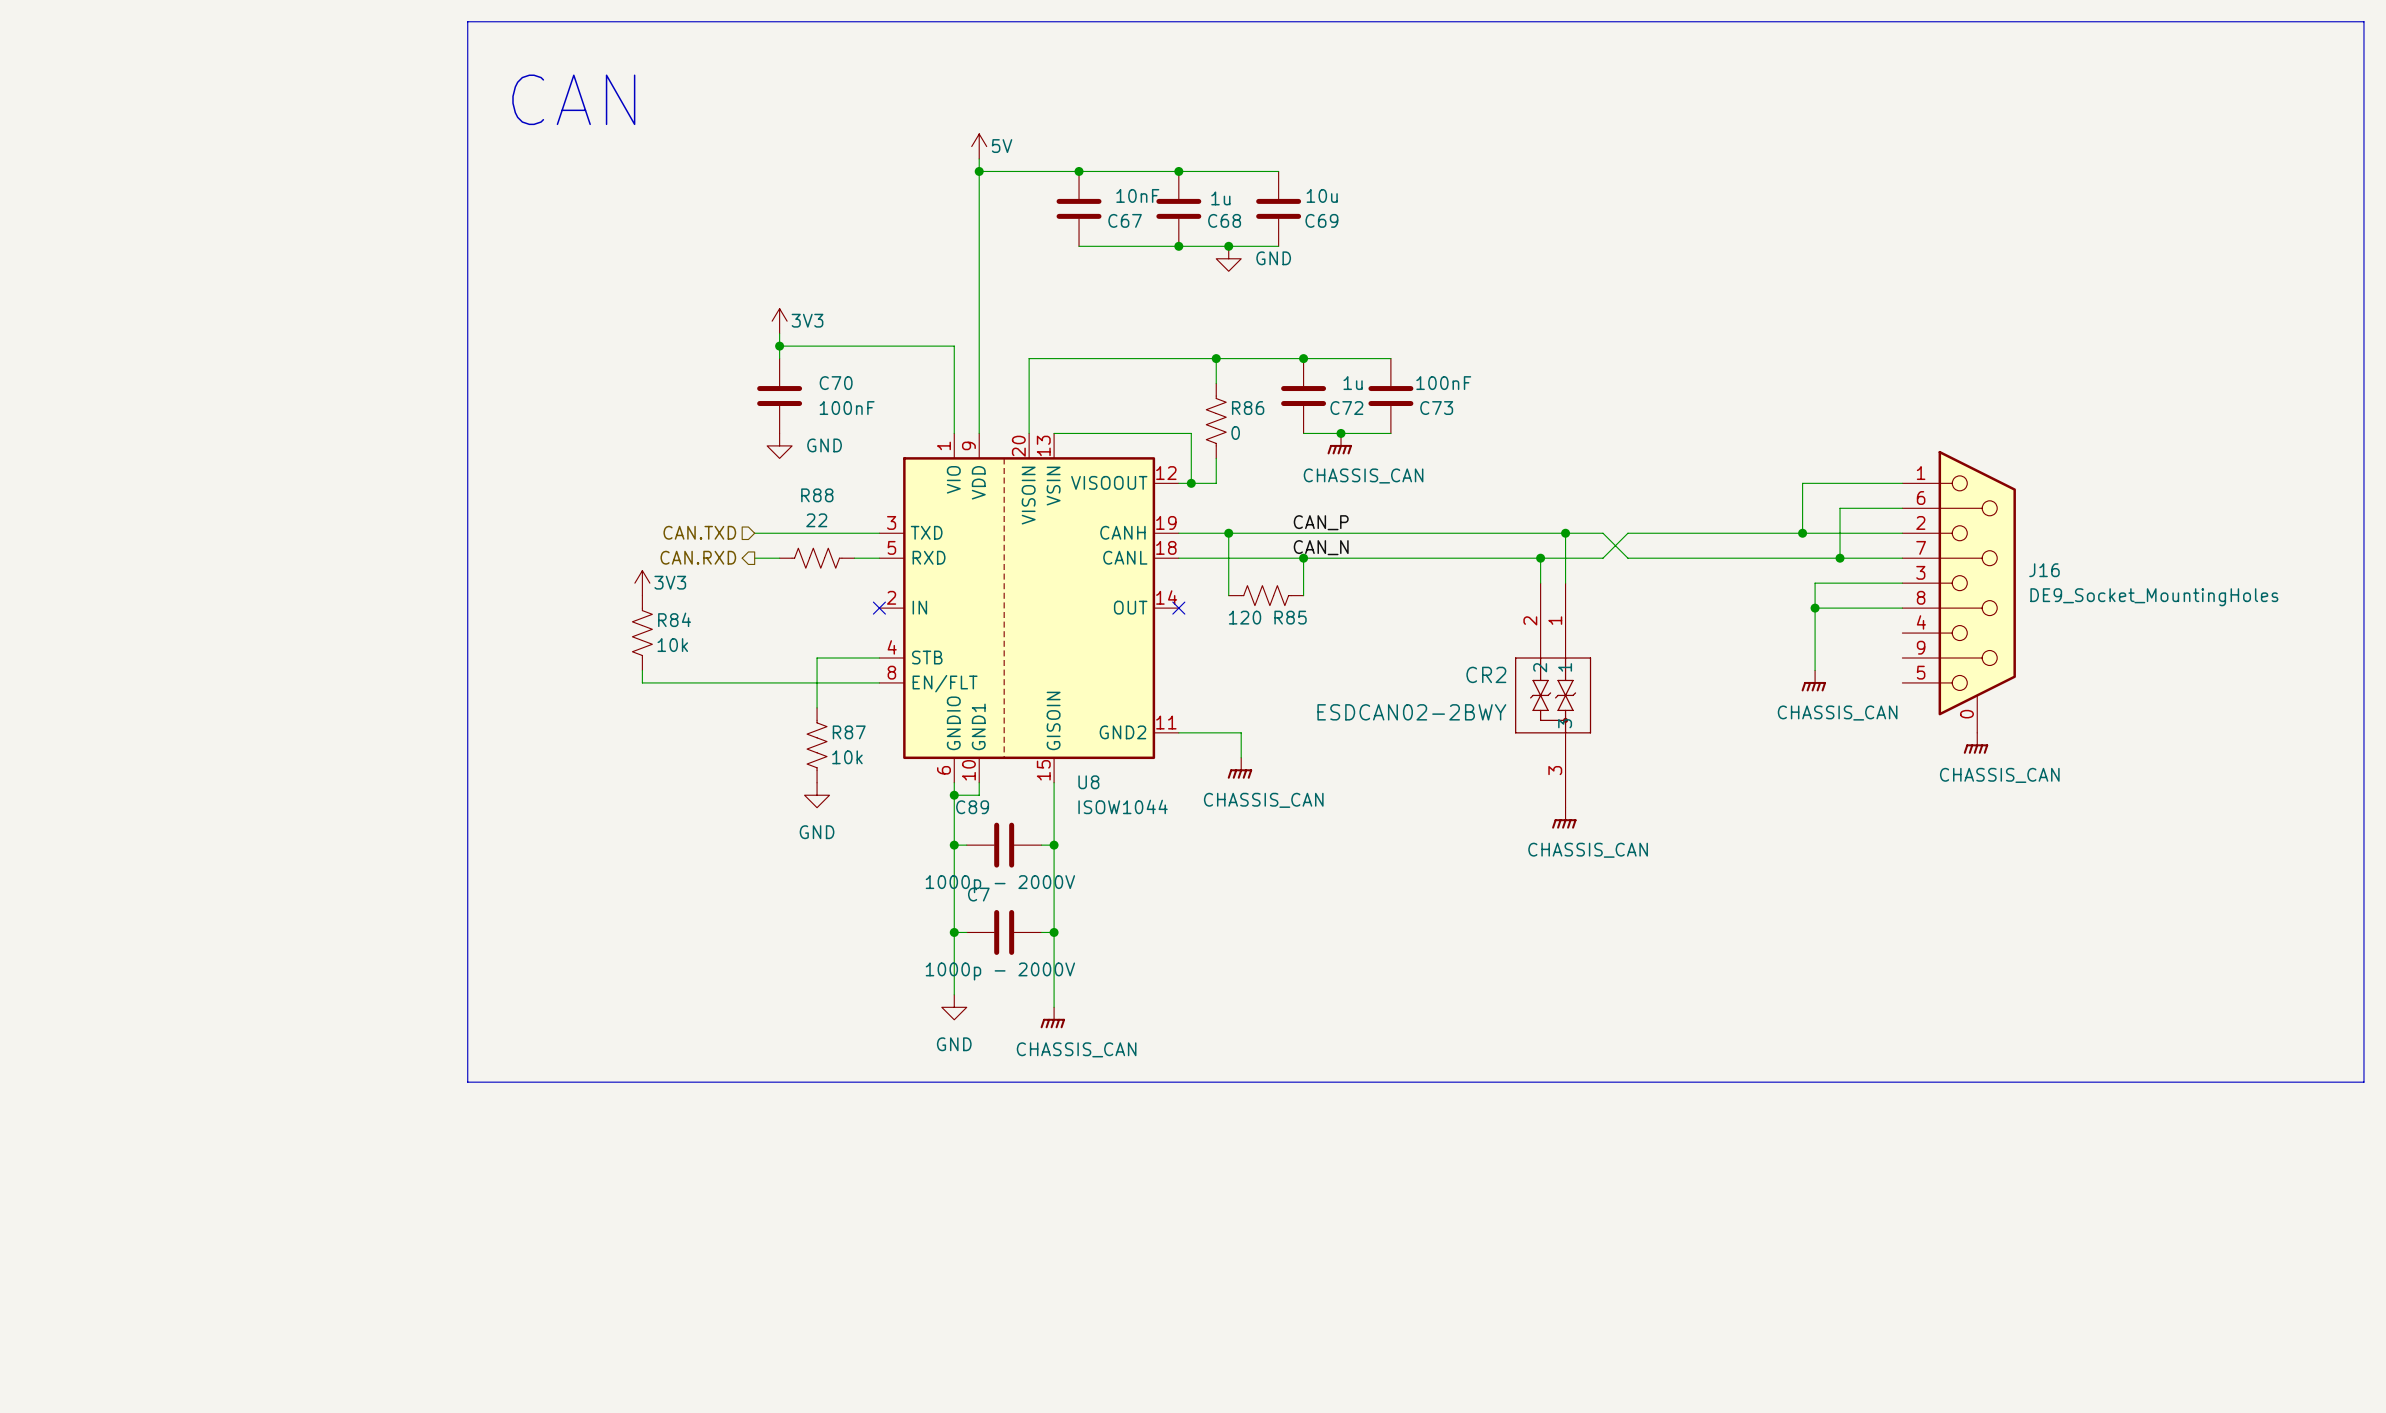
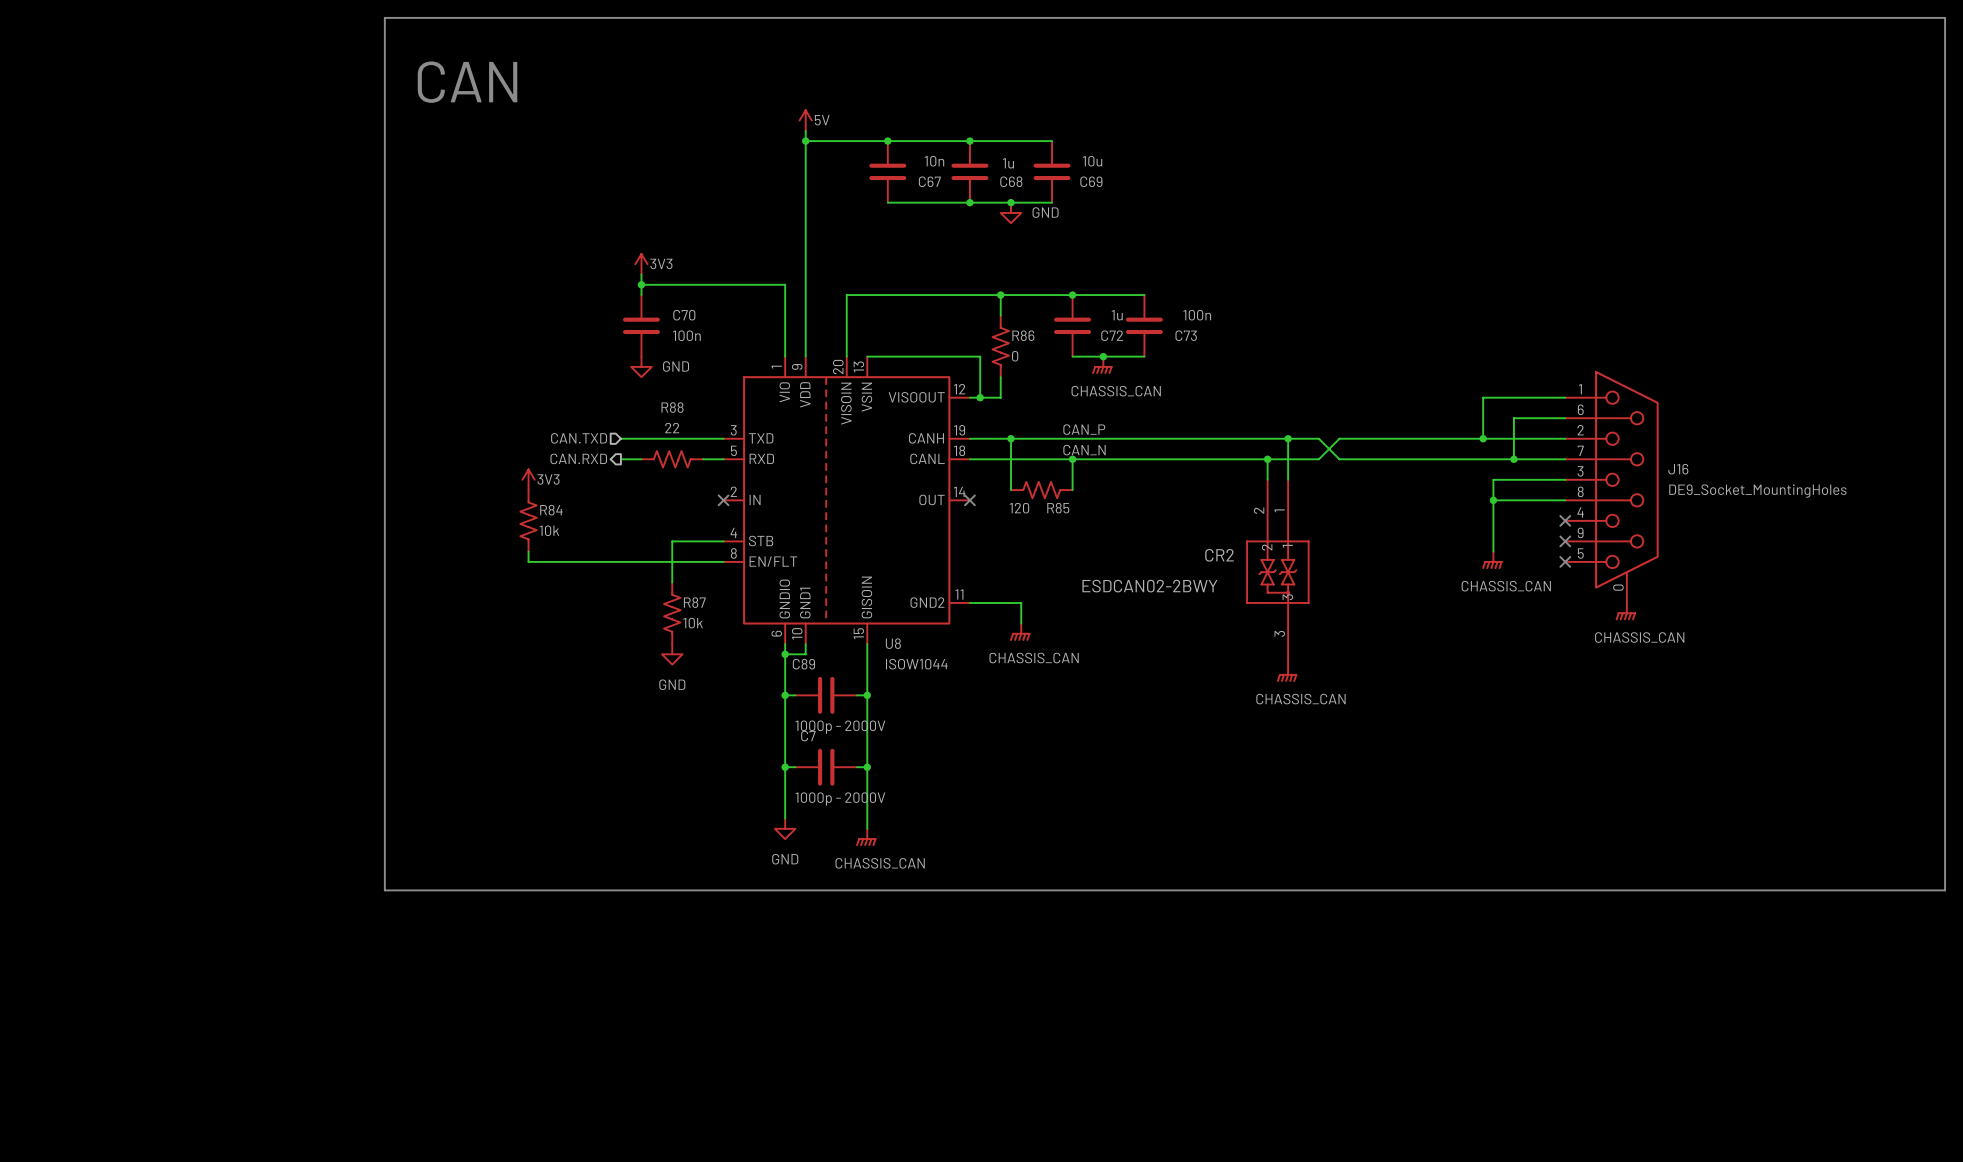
C67 value: 10nF (1137, 195) -> 10n (934, 161)
C73 value: 100nF (1443, 383) -> 100n (1197, 315)
C70 value: 100nF (847, 408) -> 100n (686, 335)
no-connect mark: none -> (1565, 520)
no-connect mark: none -> (1565, 541)
no-connect mark: none -> (1565, 561)

